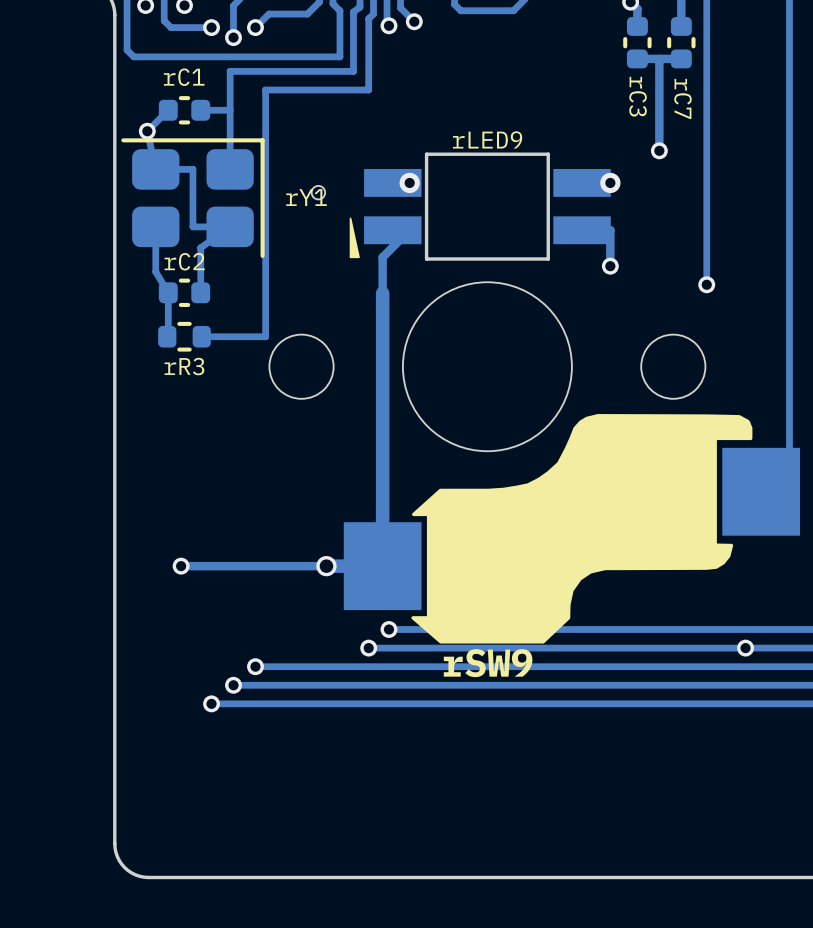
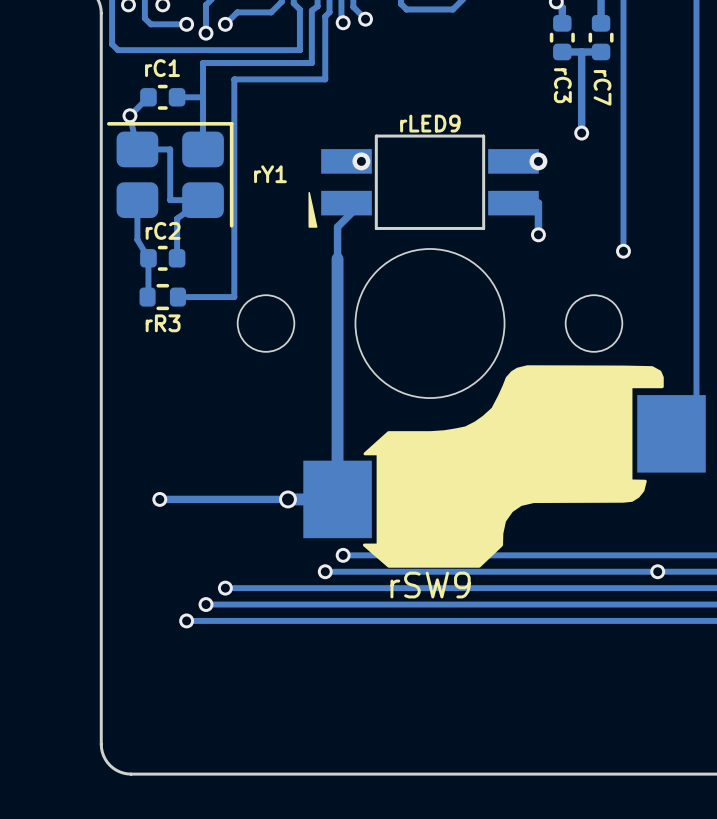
rSW9 footprint: [269, 185, 801, 644] -> [237, 248, 706, 568]

